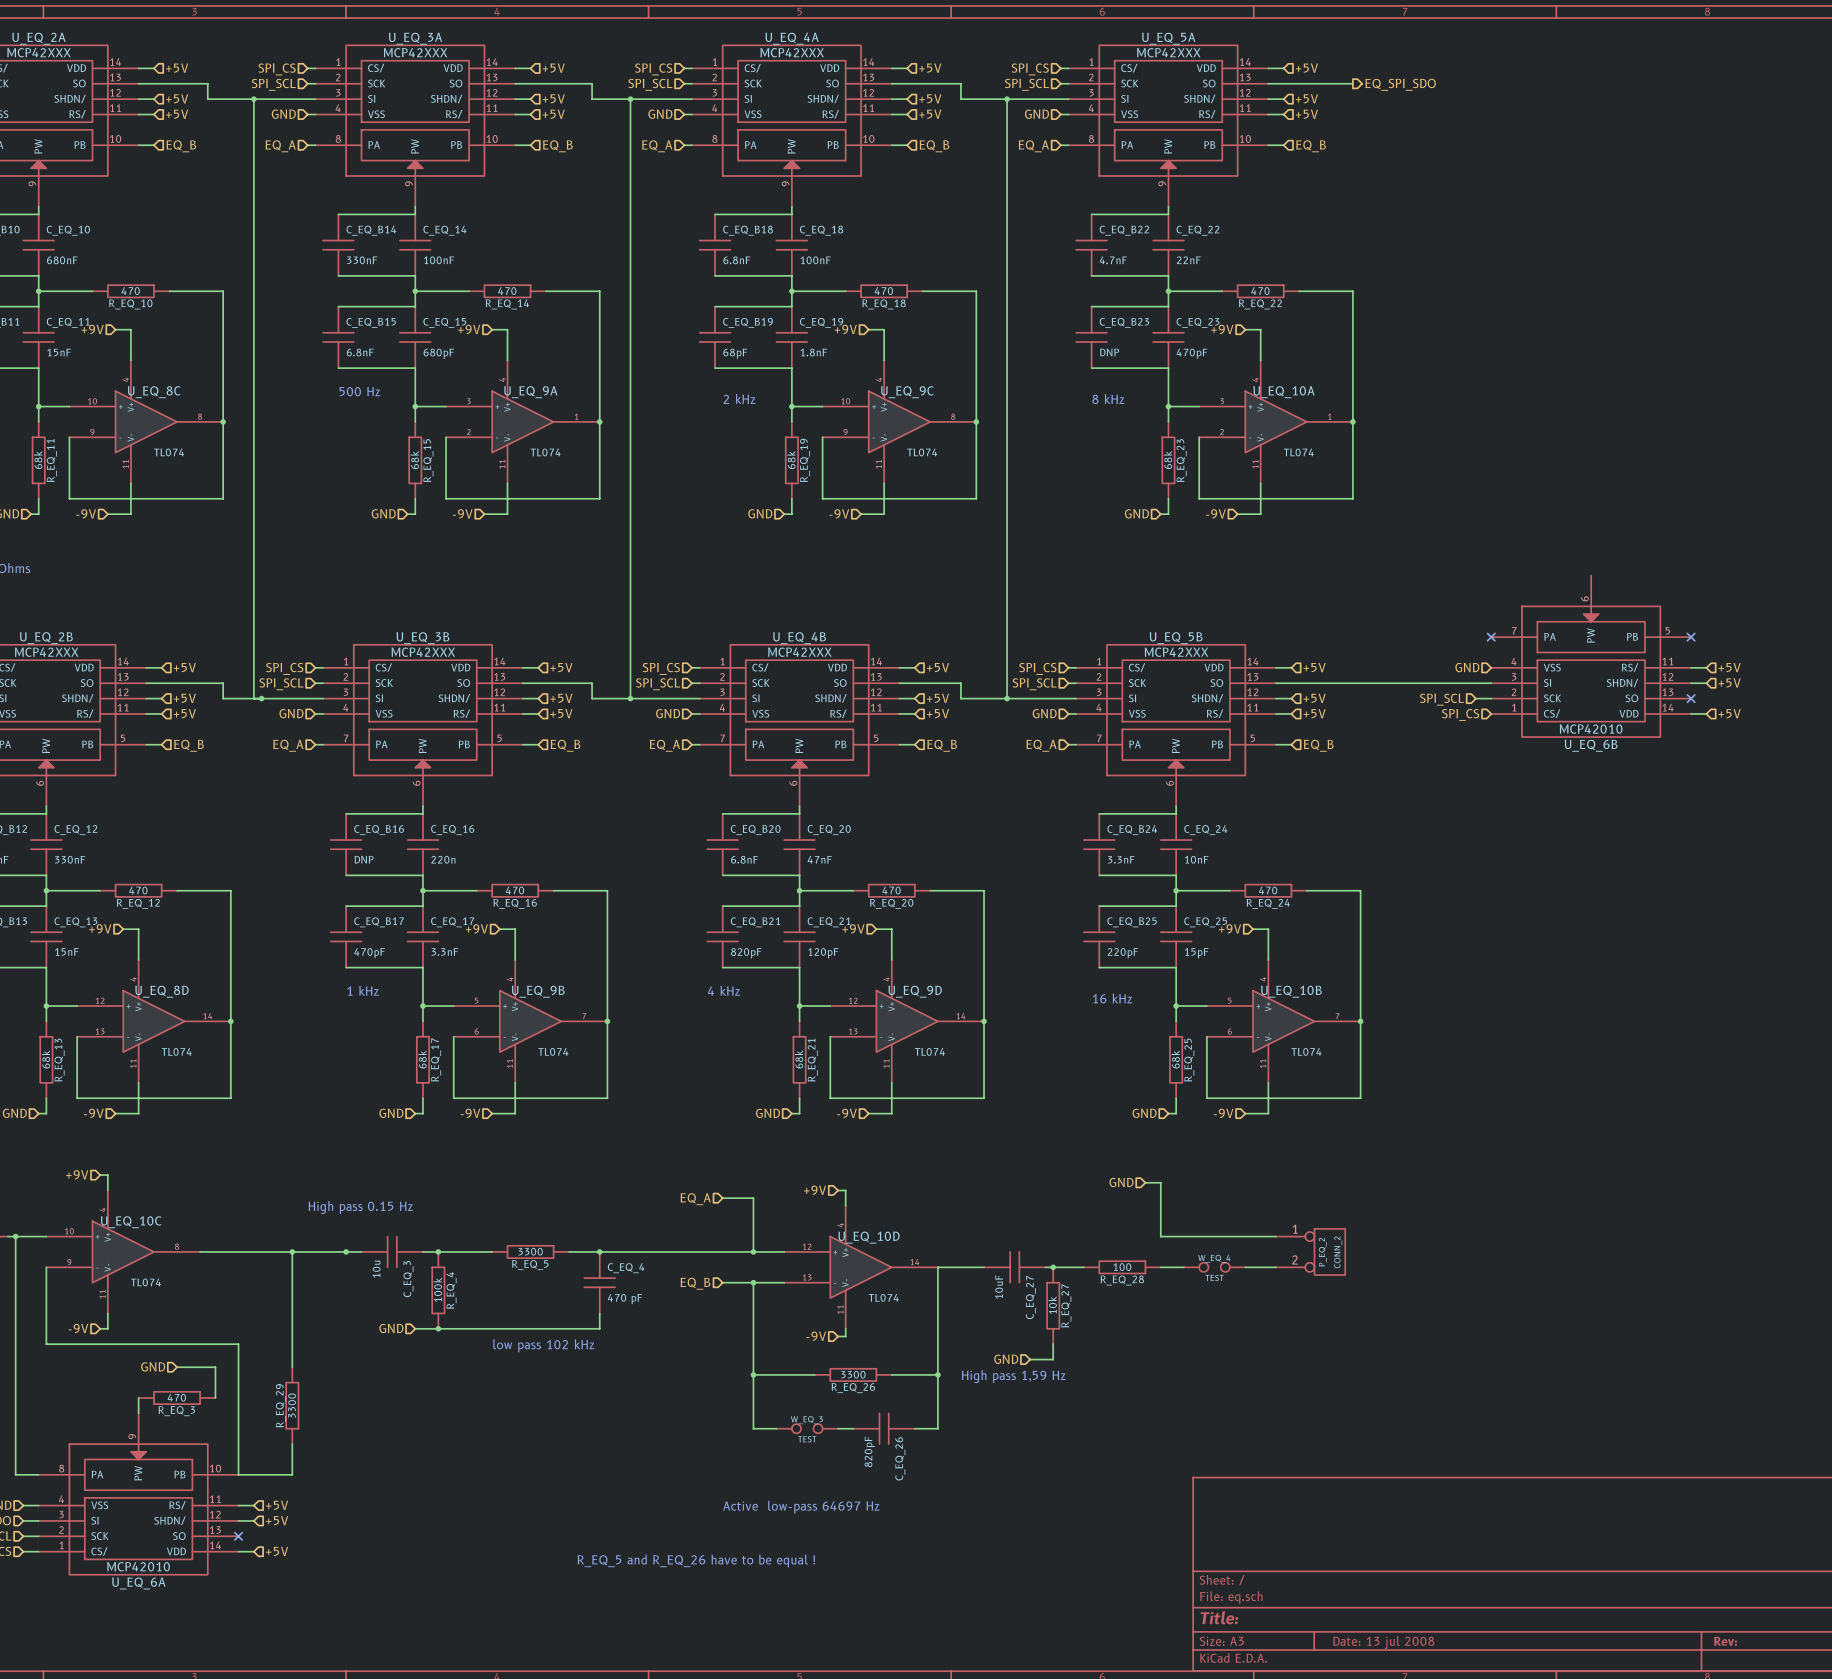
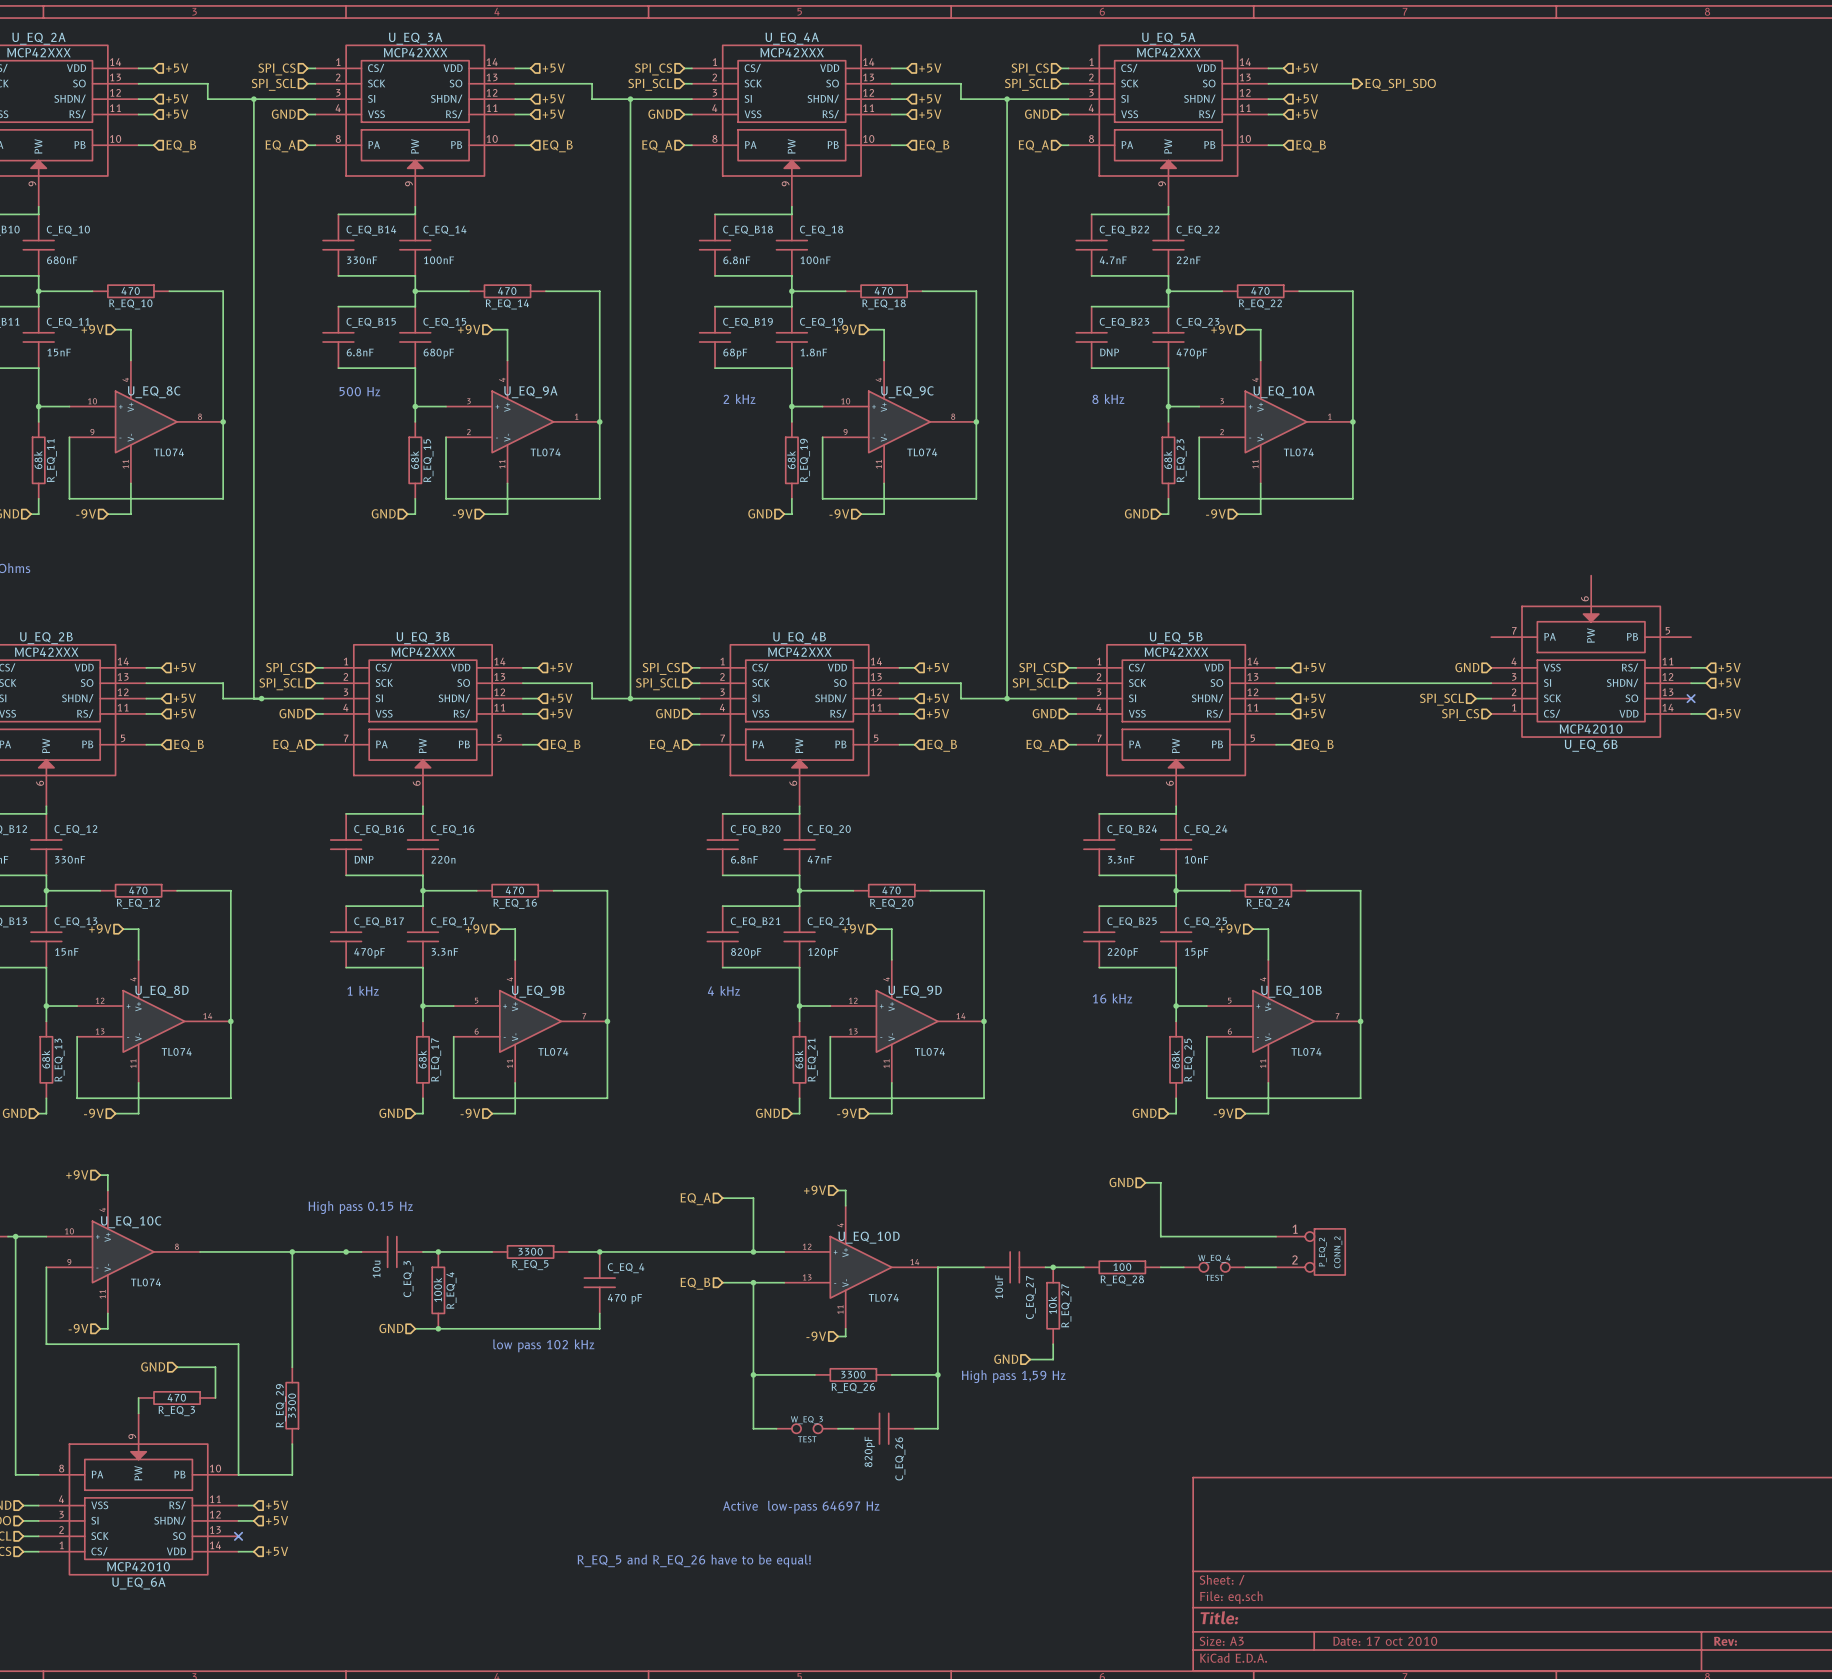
no-connect mark: (1491, 637) -> none
no-connect mark: (1691, 637) -> none
text: R_EQ_5 and R_EQ_26 have to be equal ! (696, 1561) -> R_EQ_5 and R_EQ_26 have to be equal! (694, 1561)
title block: Date: 13 jul 2008 (1383, 1642) -> Date: 17 oct 2010 (1385, 1641)

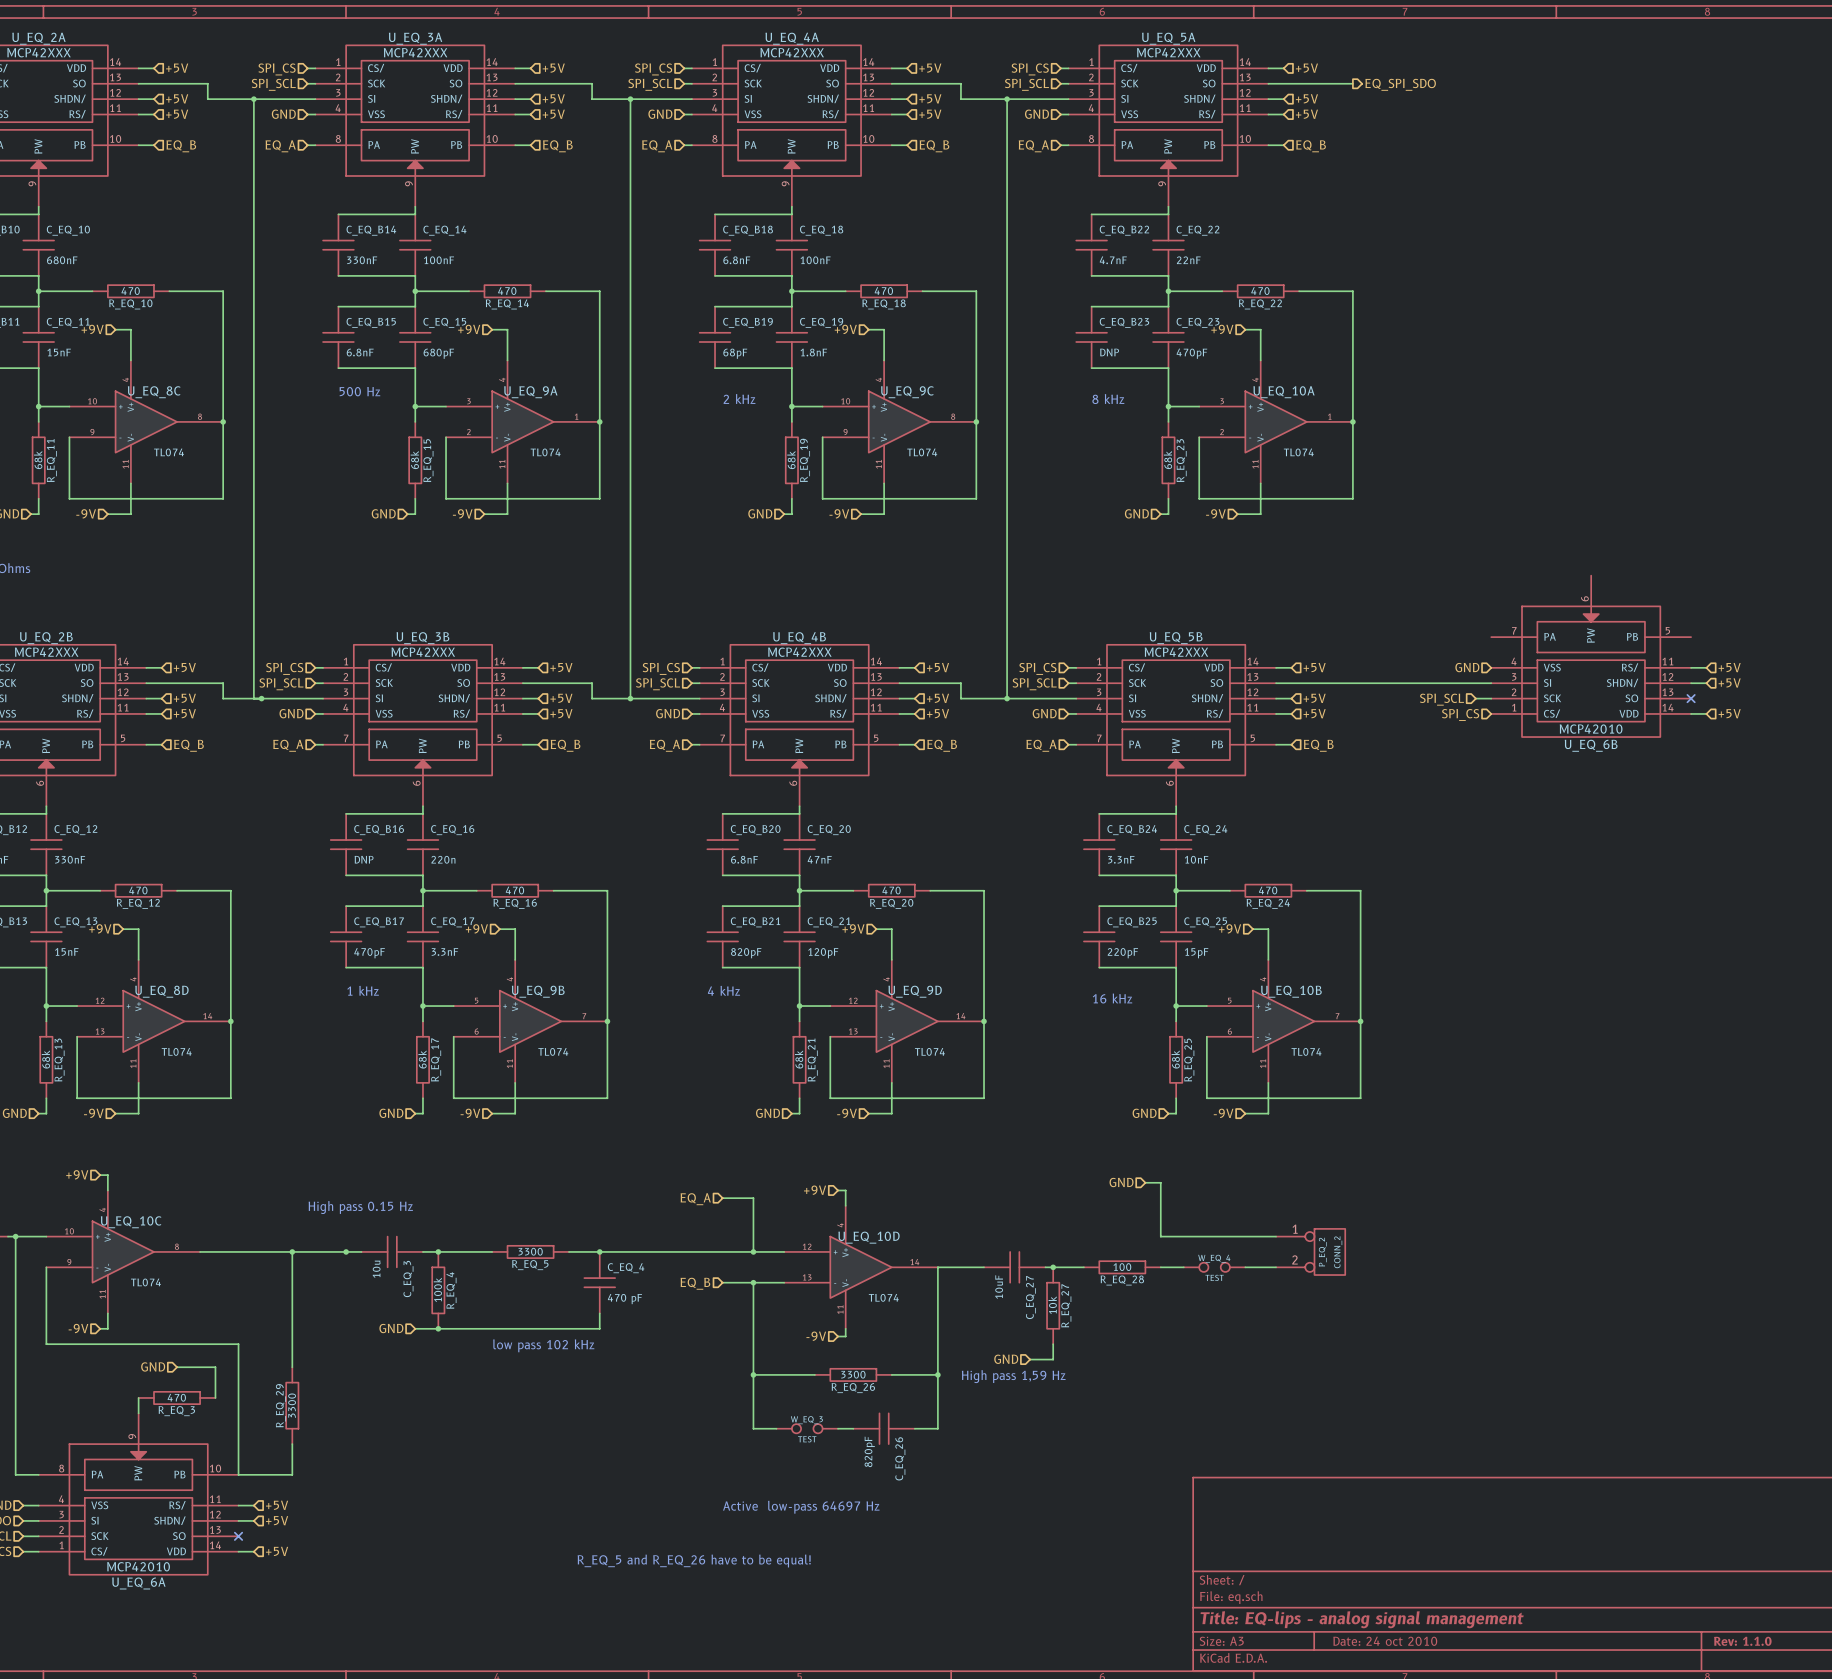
title block: Title: (1219, 1617) -> Title: EQ-lips - analog signal management (1362, 1619)
title block: Date: 17 oct 2010 (1385, 1641) -> Date: 24 oct 2010 (1385, 1641)
title block: Rev: (1725, 1641) -> Rev: 1.1.0 (1742, 1641)

